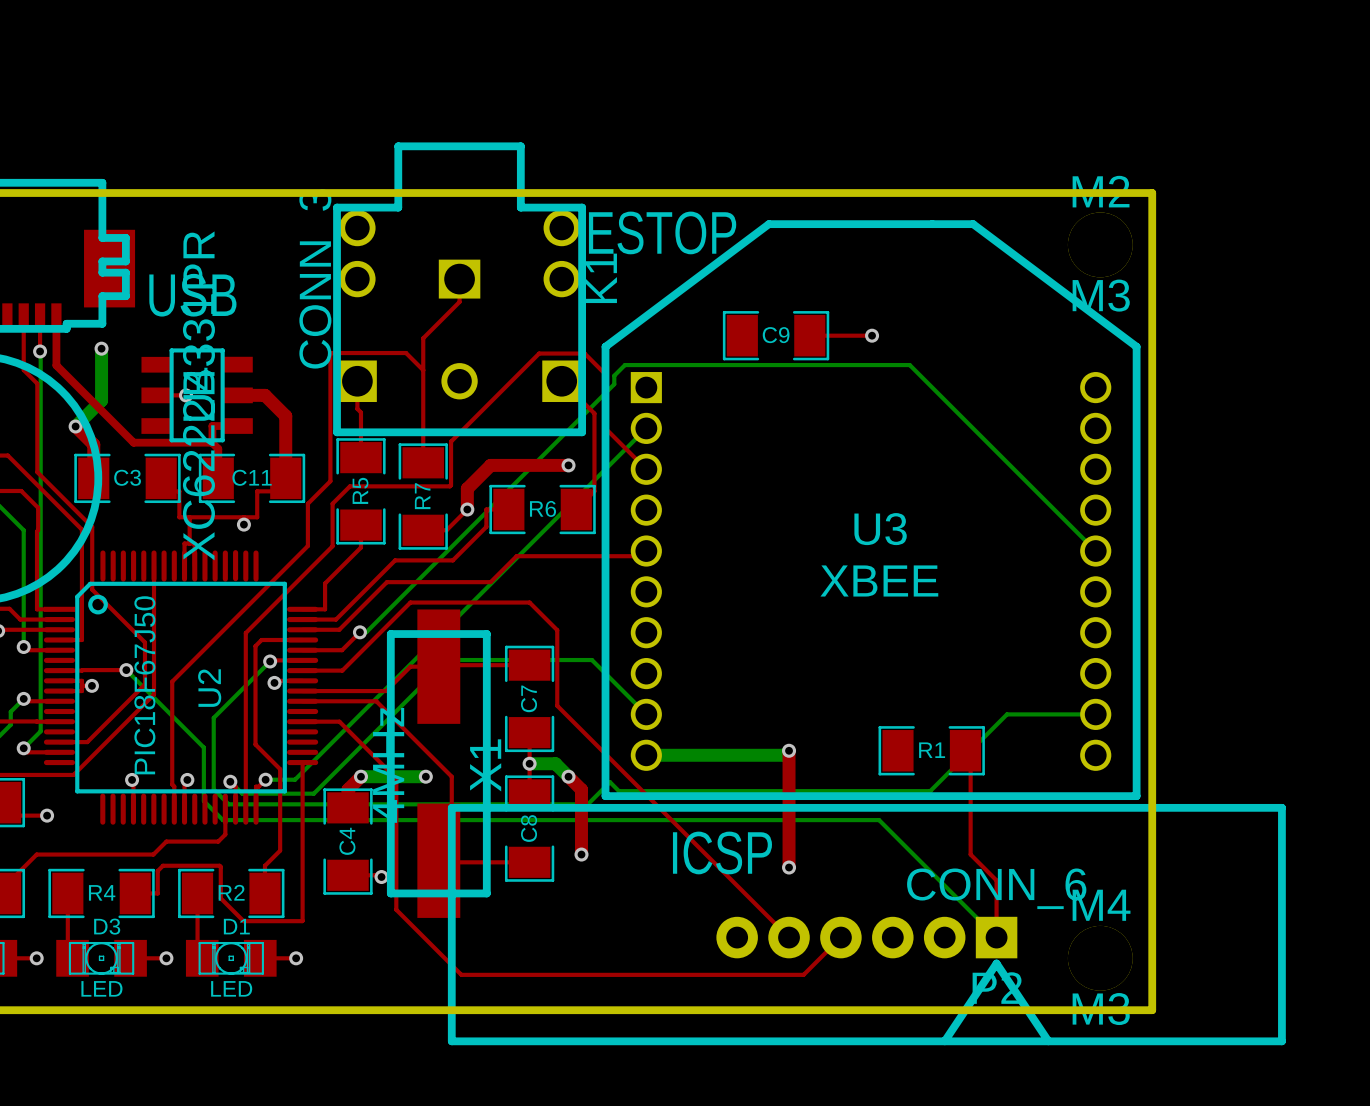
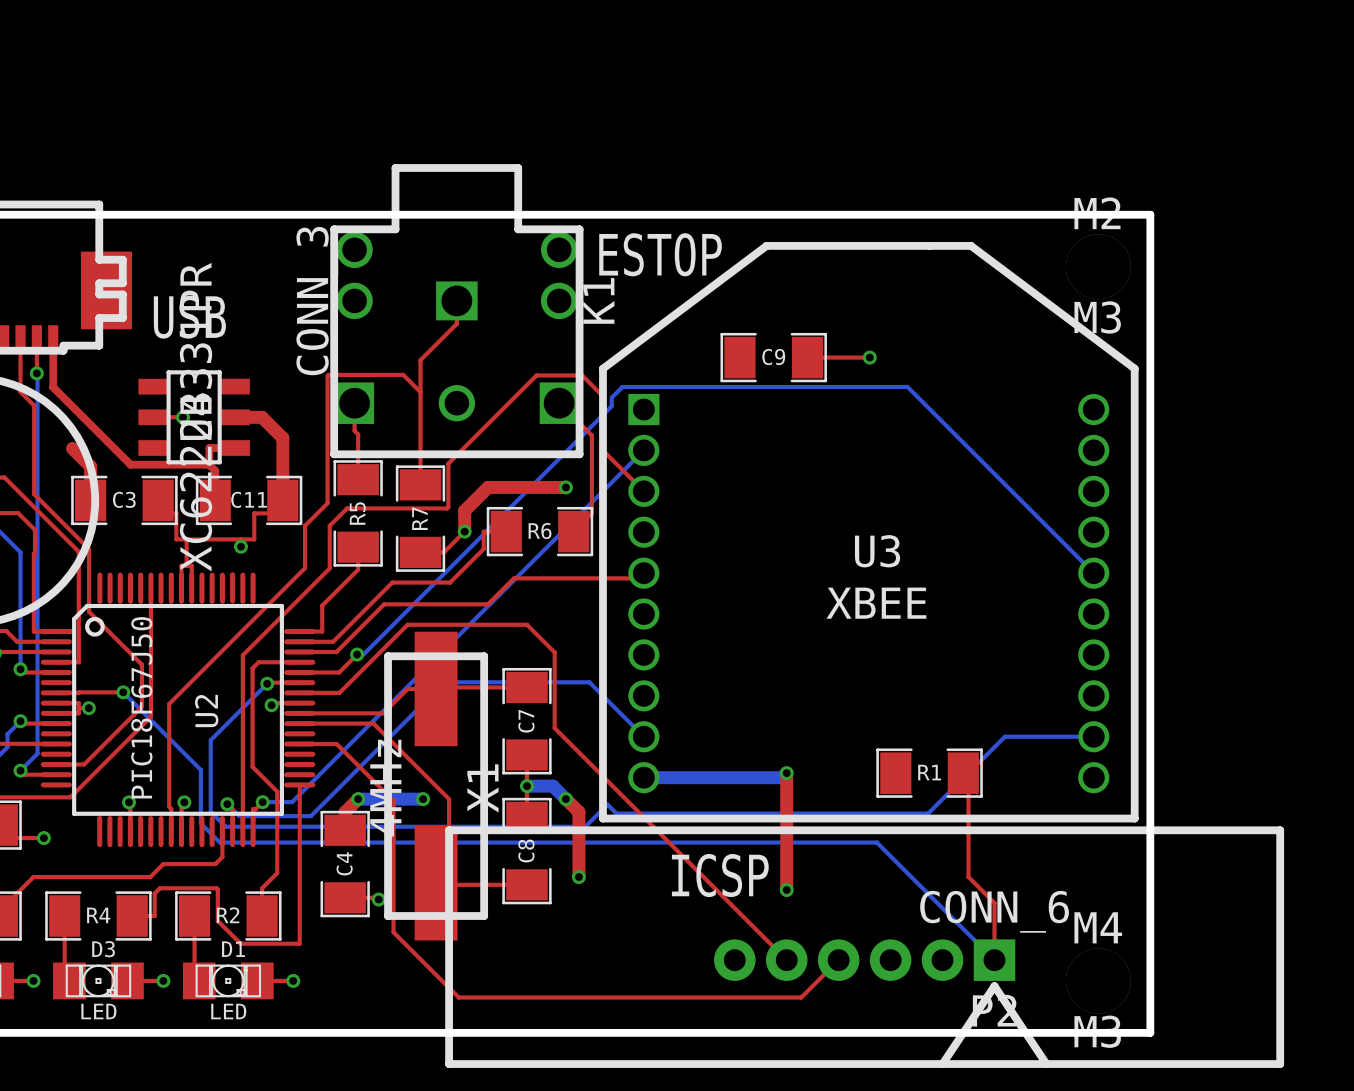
bottom track: (101, 348) (101, 400) (75, 426) -> none
via: (101, 348) -> none
via: (75, 426) -> none

